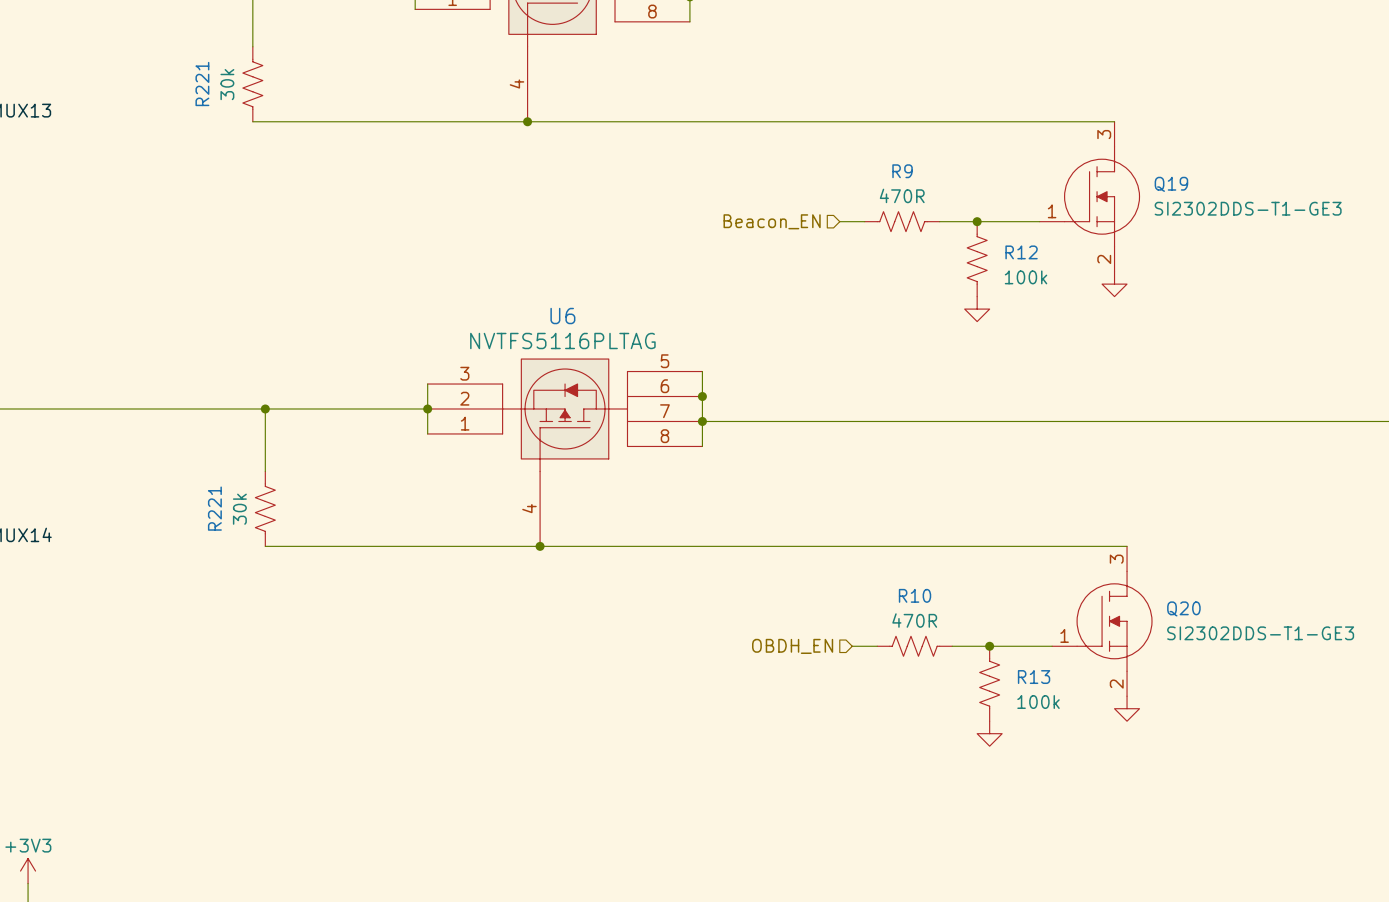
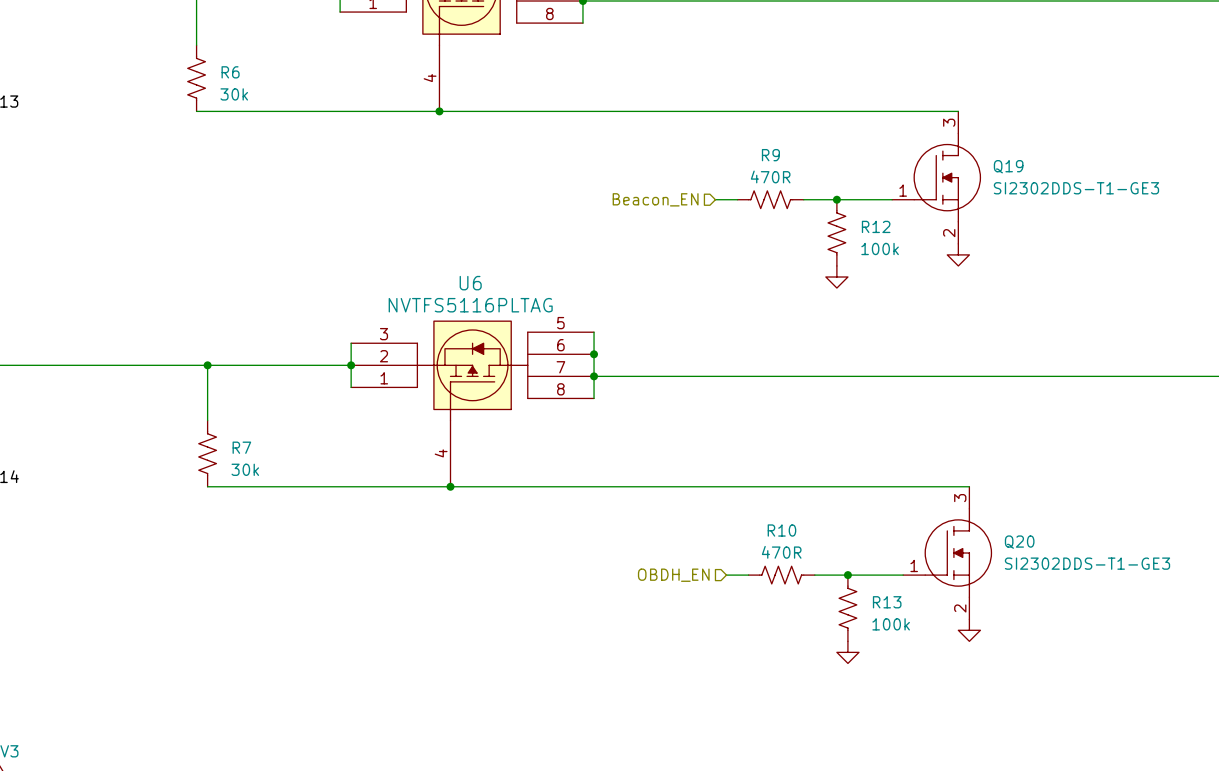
R221 name: R221 (202, 84) -> R6 (230, 72)
R221 value rotation: 0° (227, 84) -> 90° clockwise (234, 94)
R221 value position: 30k (227, 84) -> 30k (234, 94)
R221 name: R221 (214, 508) -> R7 (241, 447)
R221 value rotation: 0° (239, 509) -> 90° clockwise (245, 469)
R221 value position: 30k (239, 509) -> 30k (245, 469)

